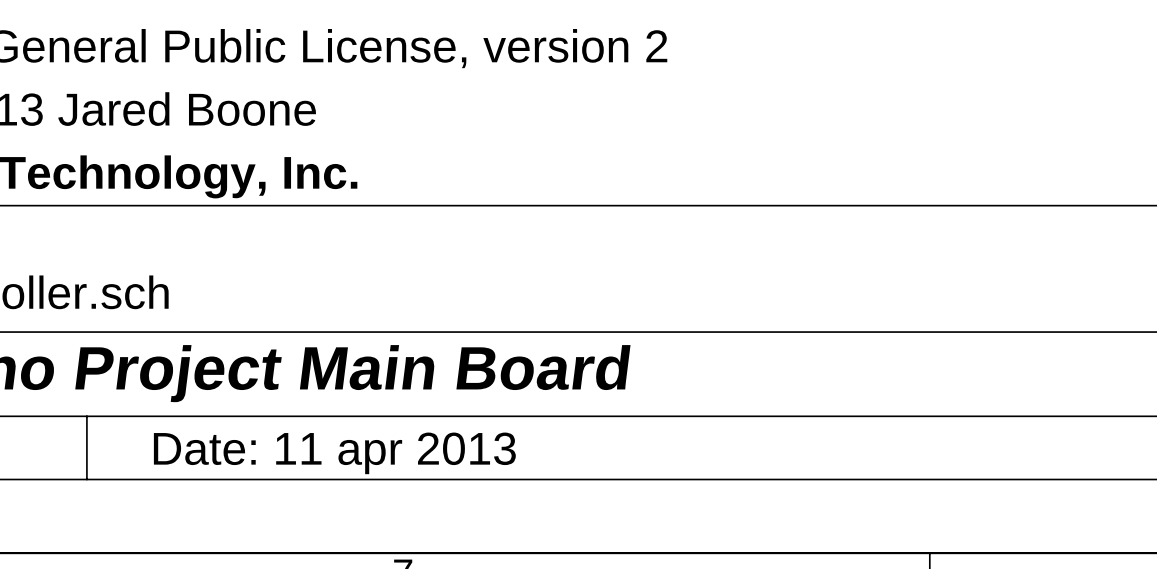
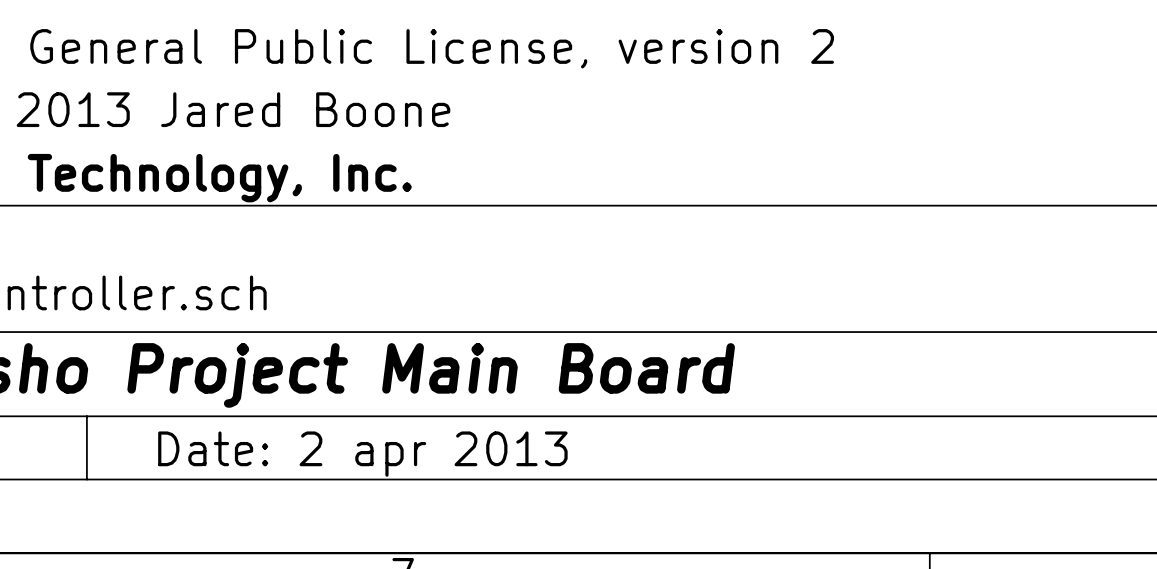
title block: Date: 11 apr 2013 (334, 453) -> Date: 2 apr 2013 (362, 454)

